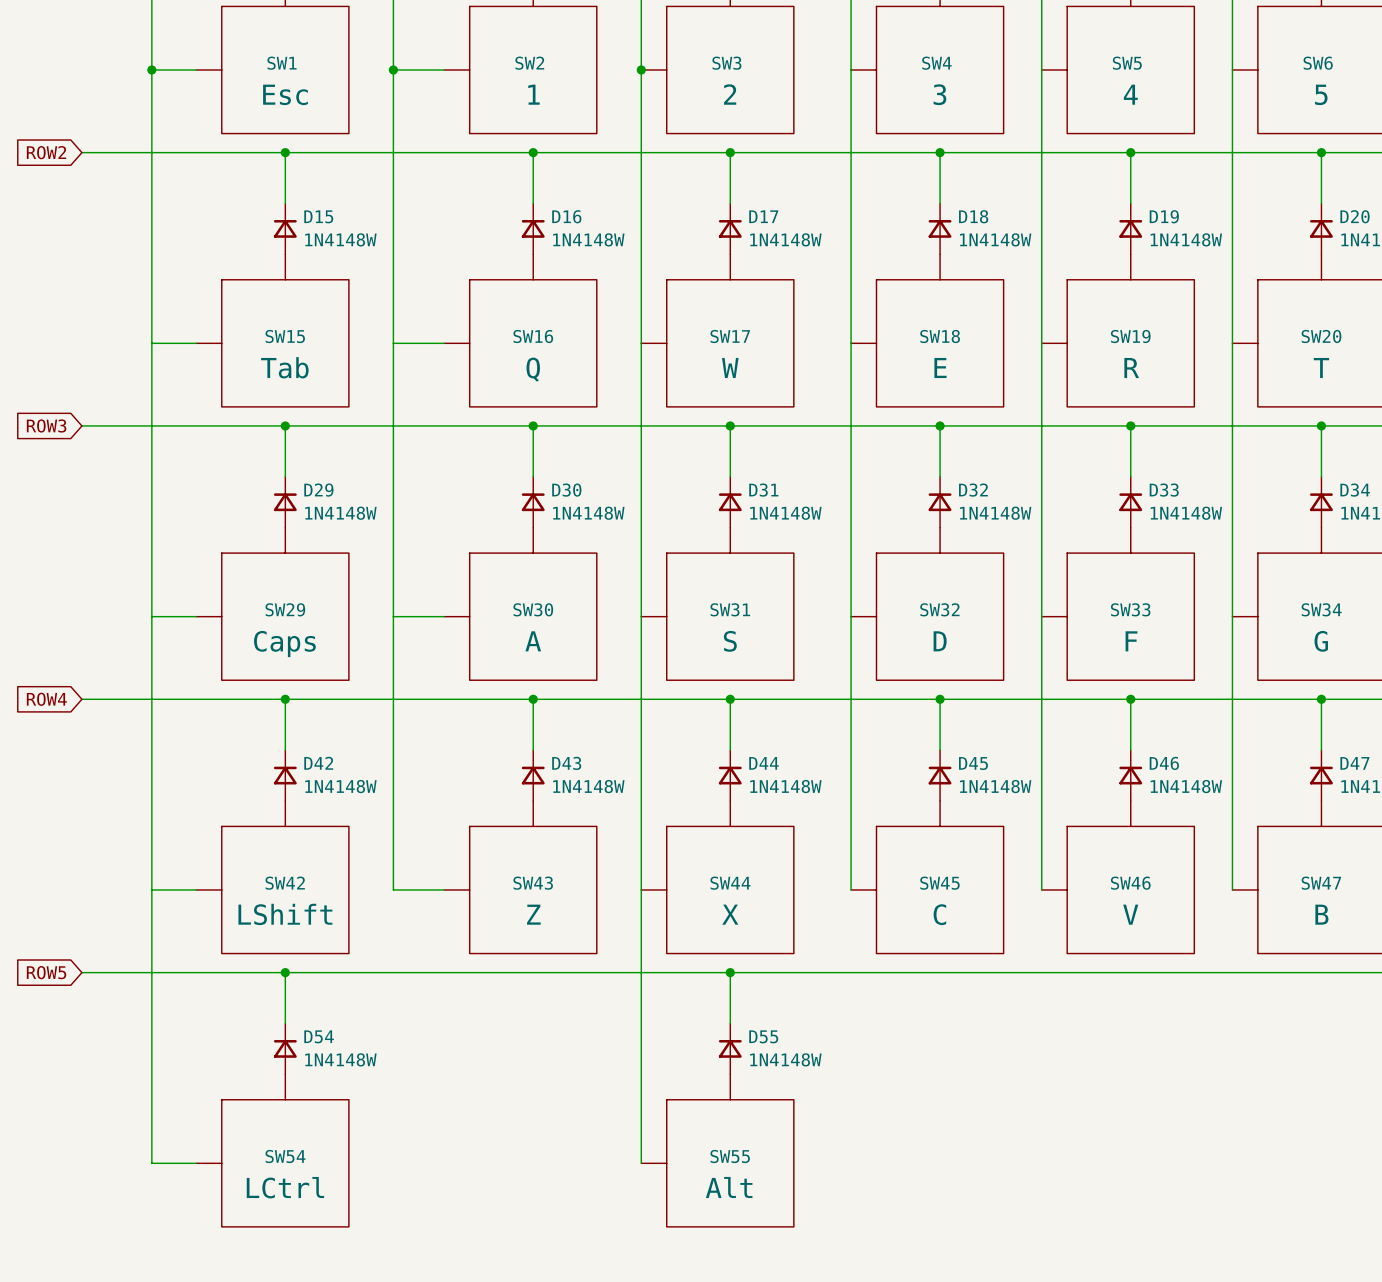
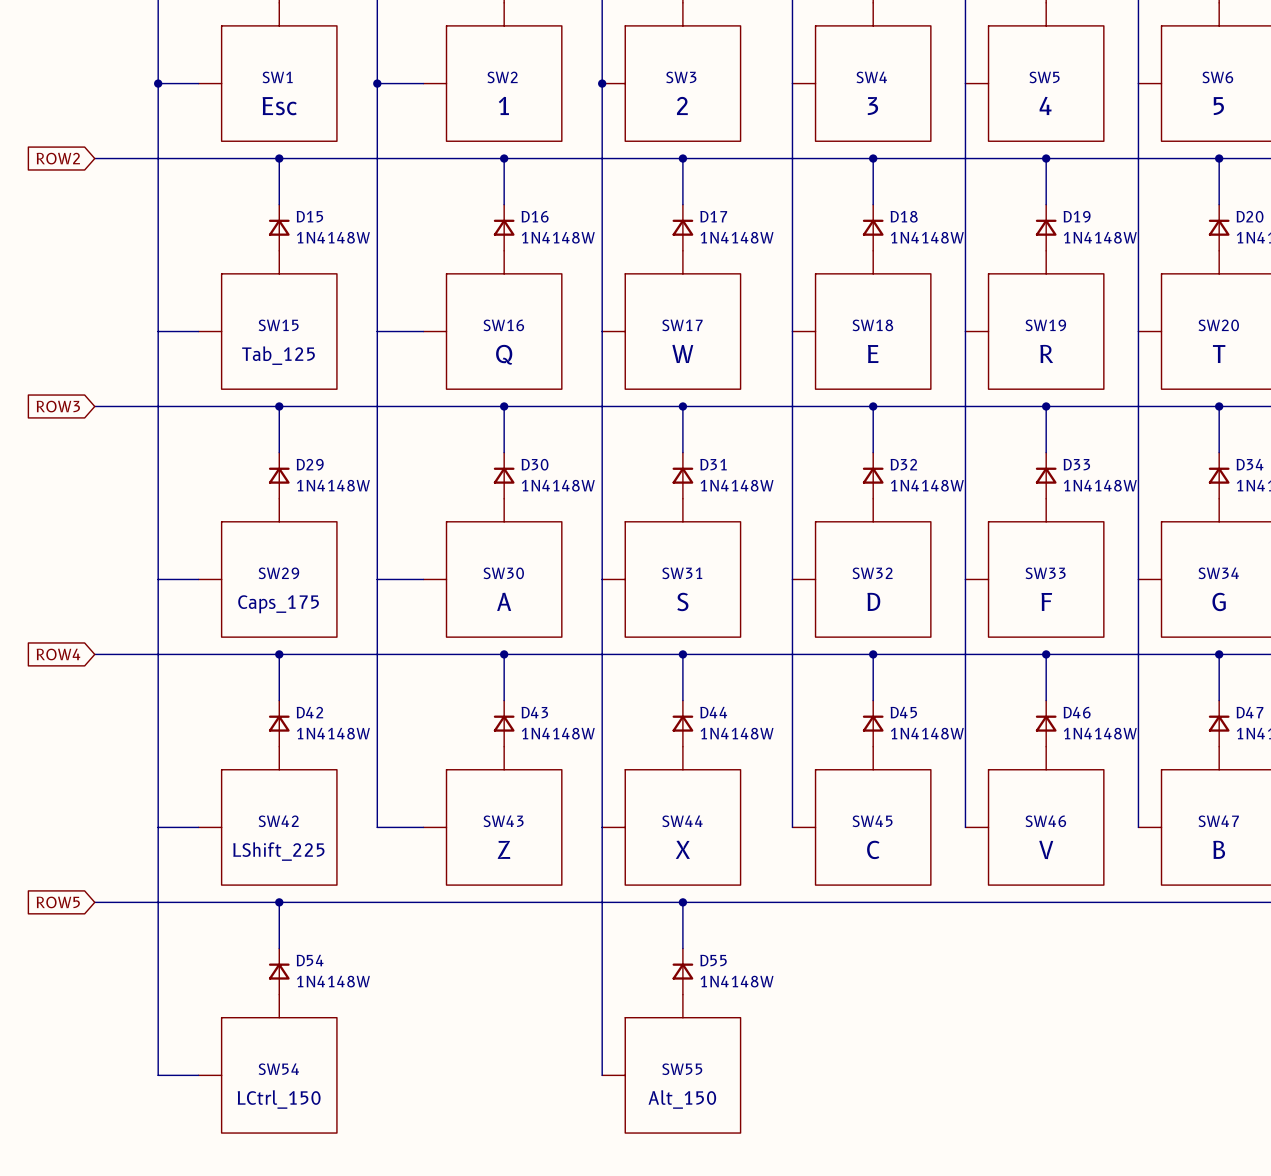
SW15 value: Tab (284, 367) -> Tab_125 (278, 355)
SW29 value: Caps (284, 644) -> Caps_175 (278, 604)
SW42 value: LShift (285, 914) -> LShift_225 (278, 851)
SW54 value: LCtrl (285, 1187) -> LCtrl_150 (279, 1099)
SW55 value: Alt (729, 1187) -> Alt_150 (682, 1099)

